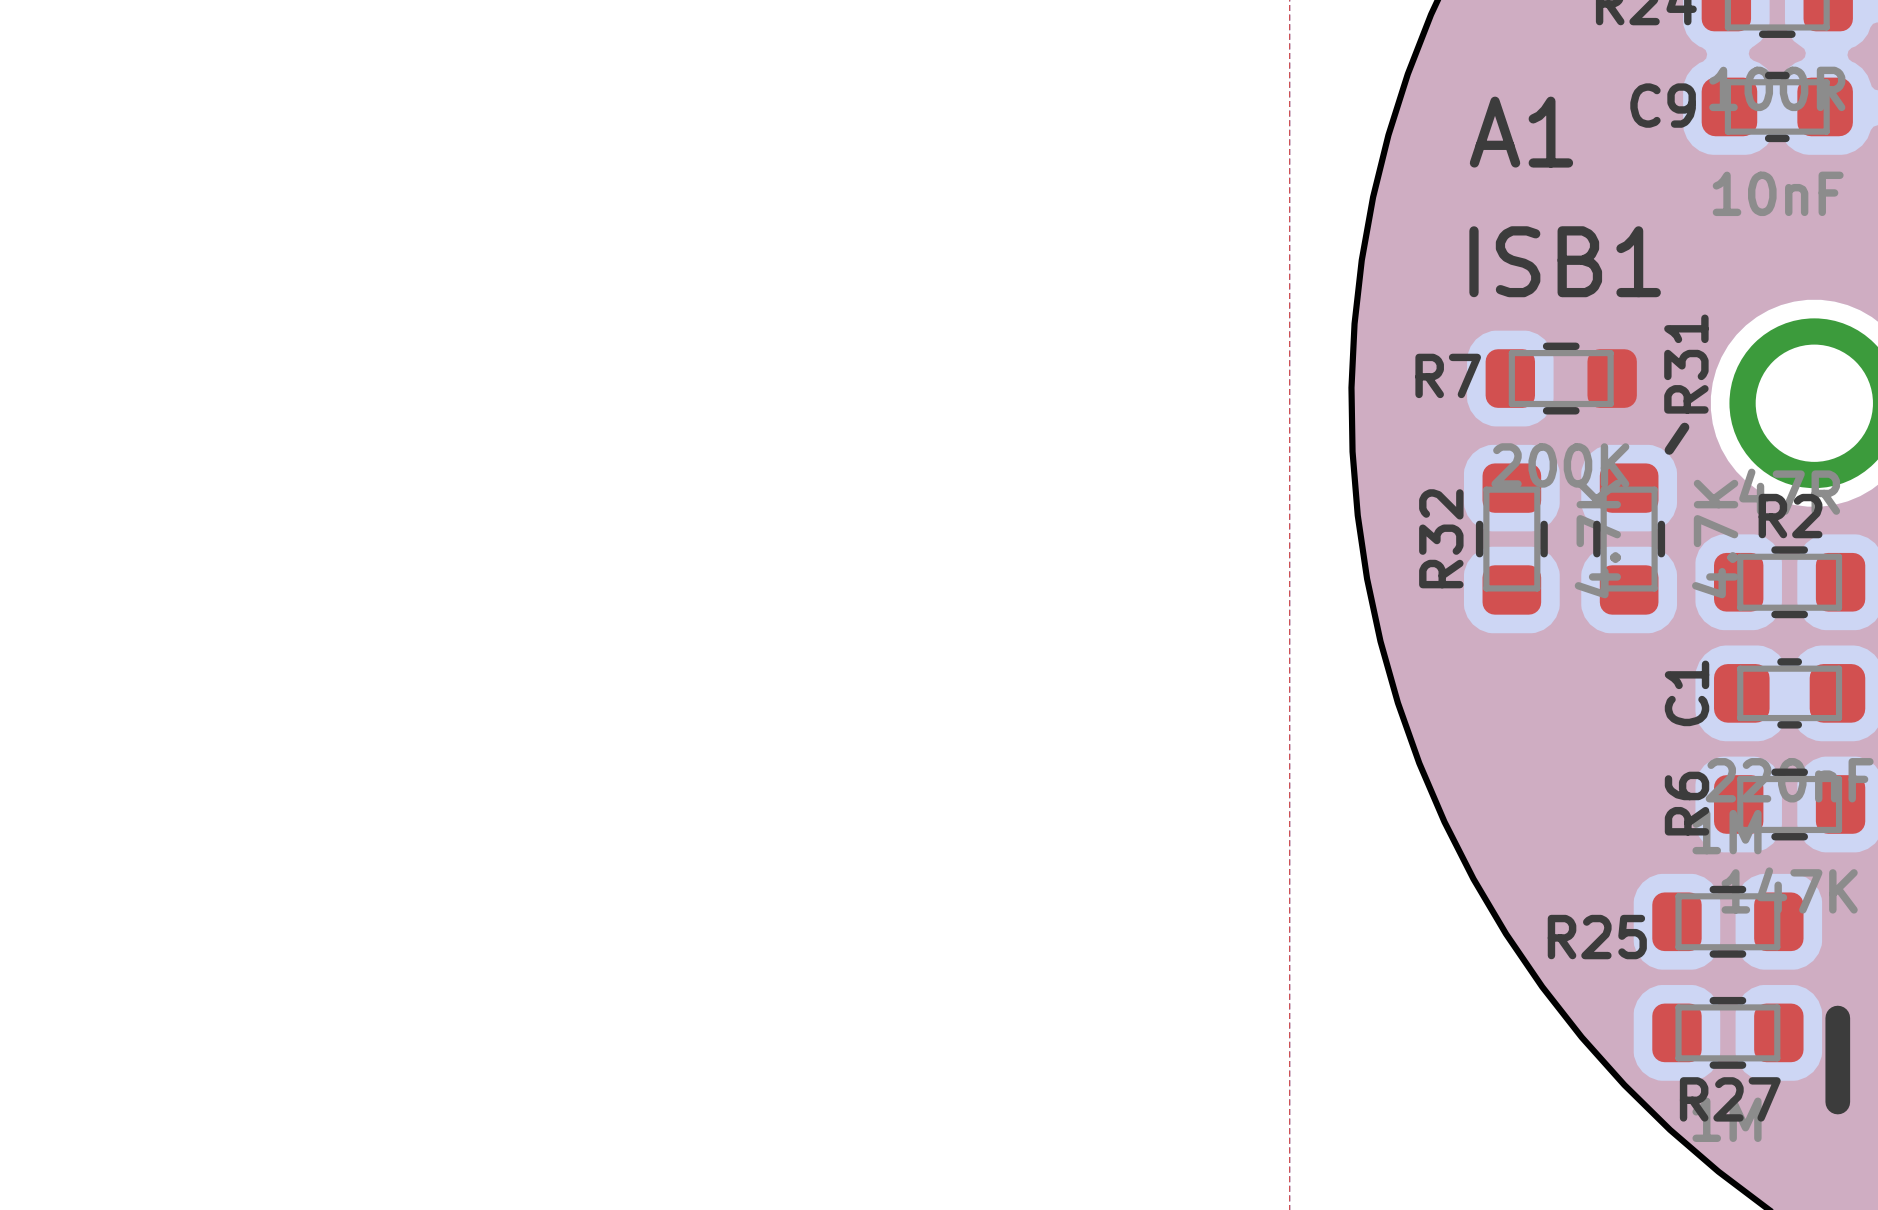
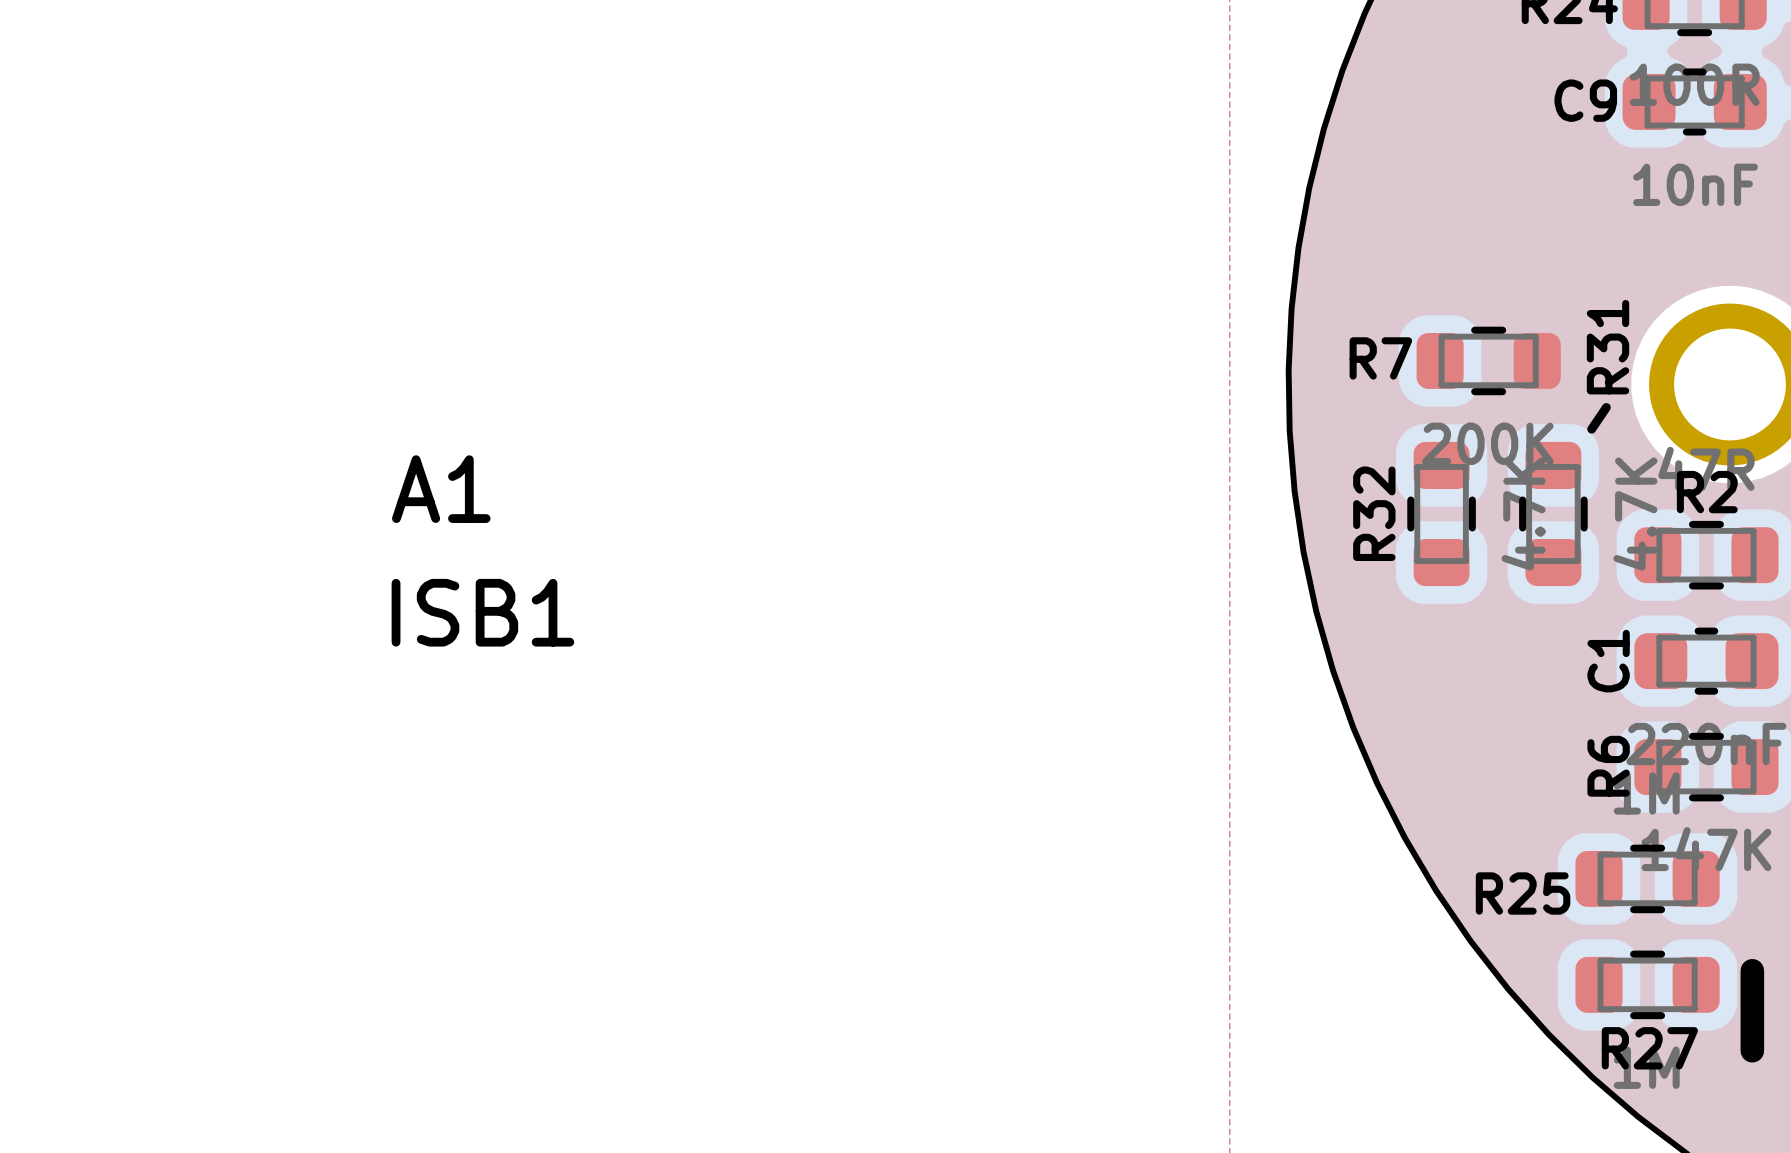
text position: A1 (1521, 132) -> A1 (441, 489)
text position: ISB1 (1565, 261) -> ISB1 (482, 612)

